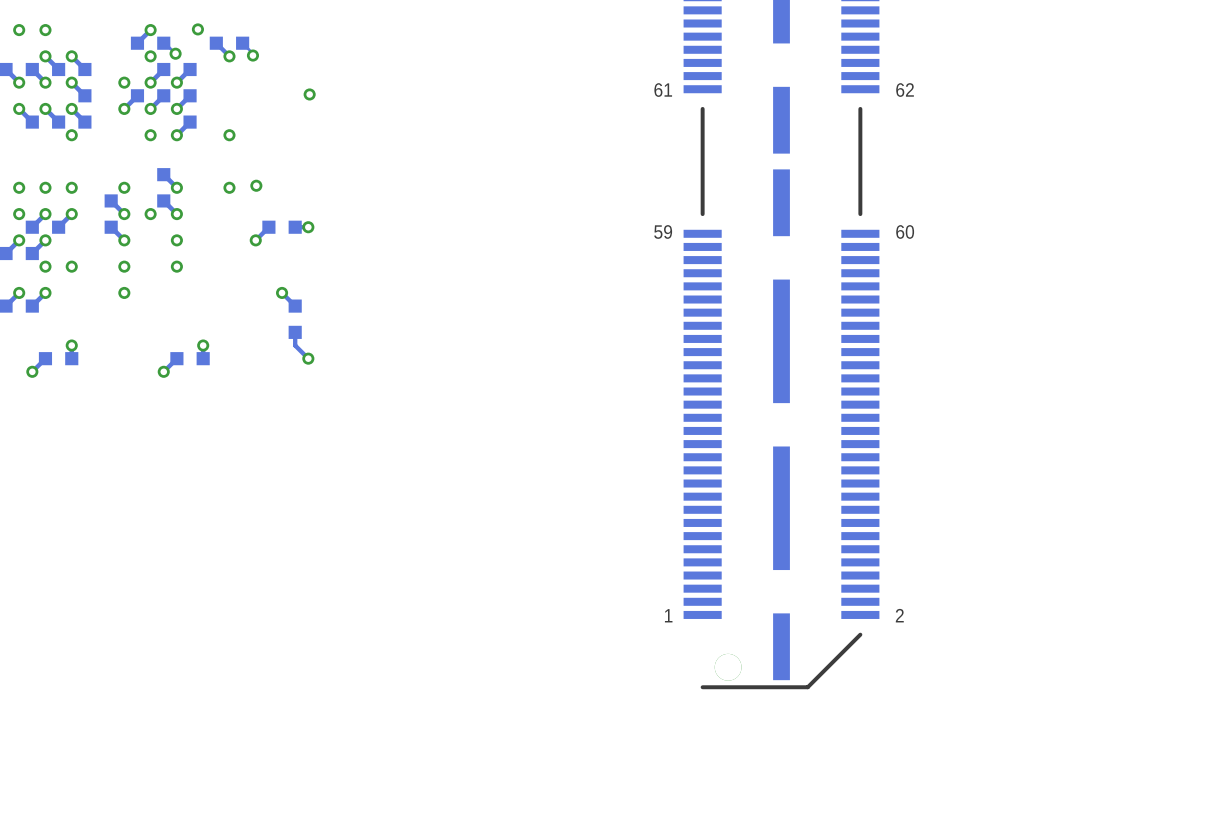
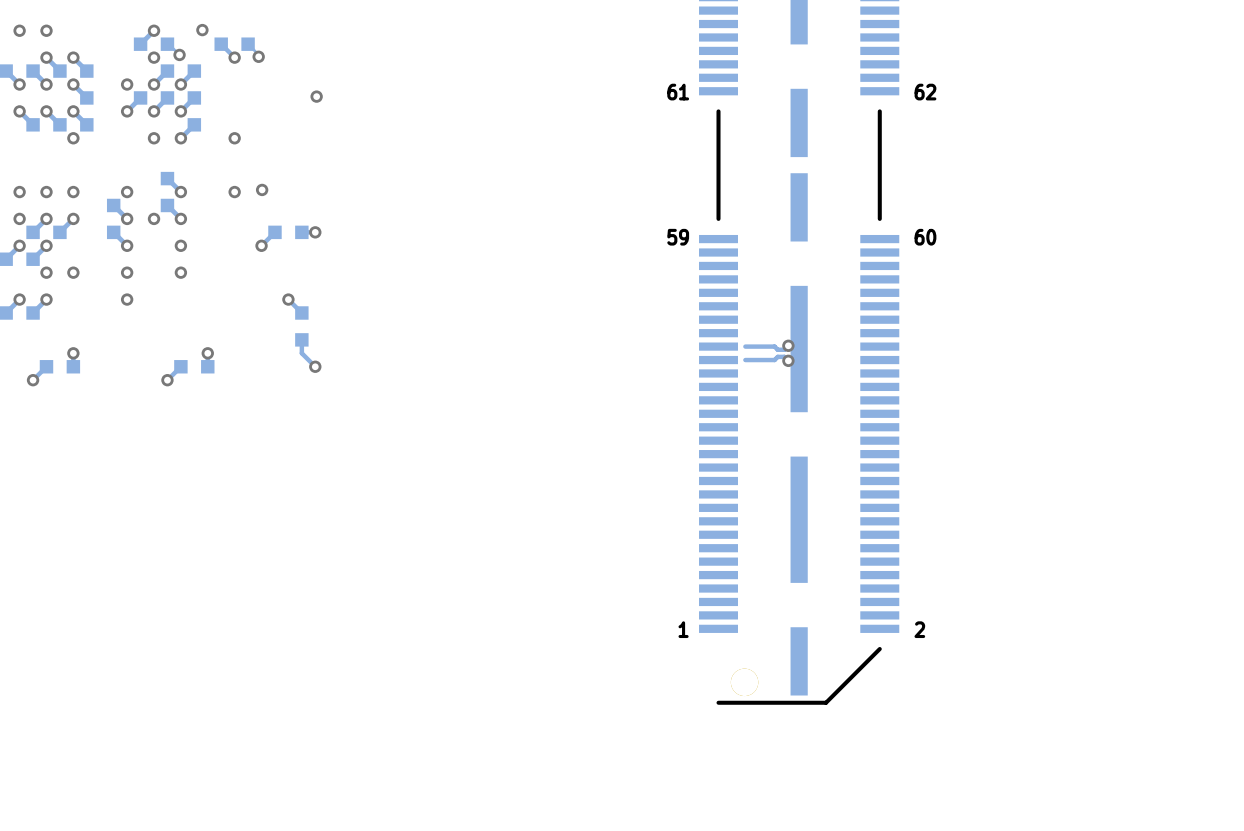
track: none -> (788, 345) (784, 349) (777, 349) (774, 346) (745, 346)
via: none -> (788, 345)
track: none -> (745, 360) (774, 360) (777, 356) (784, 356) (788, 360)
via: none -> (788, 360)

